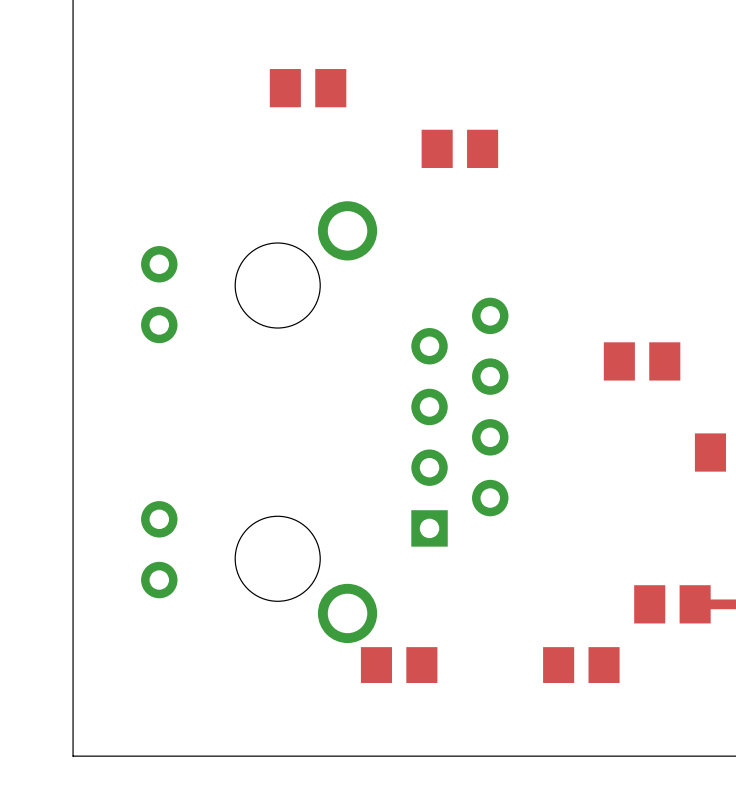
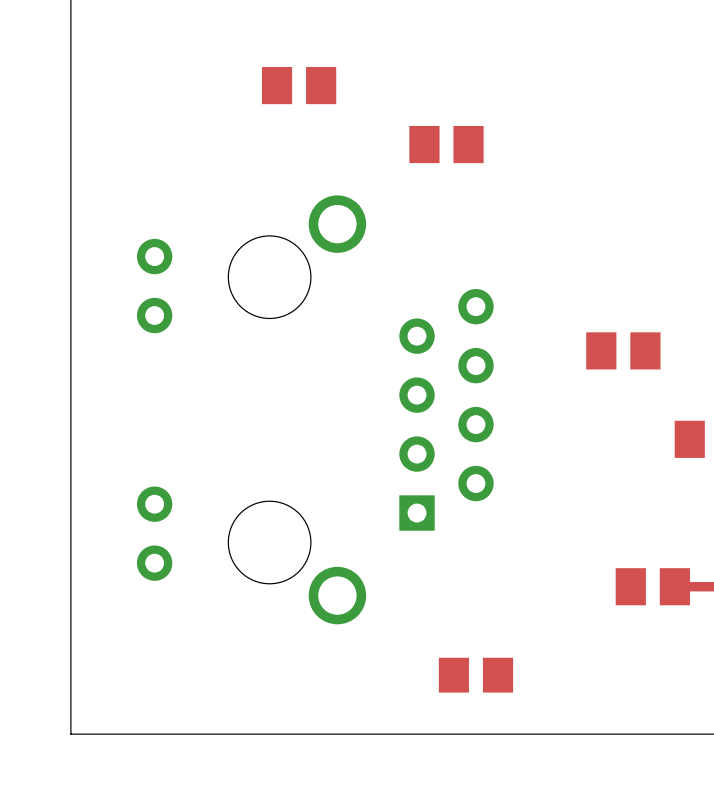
part: (399, 665) -> none
part: (581, 665) -> none
part: none -> (475, 675)

